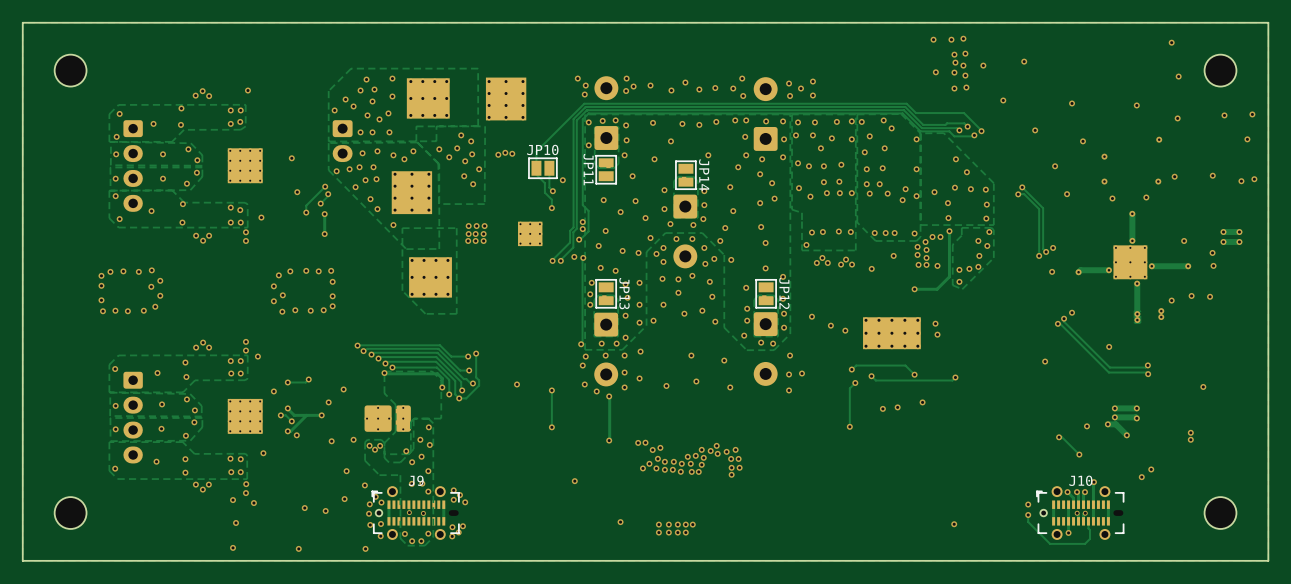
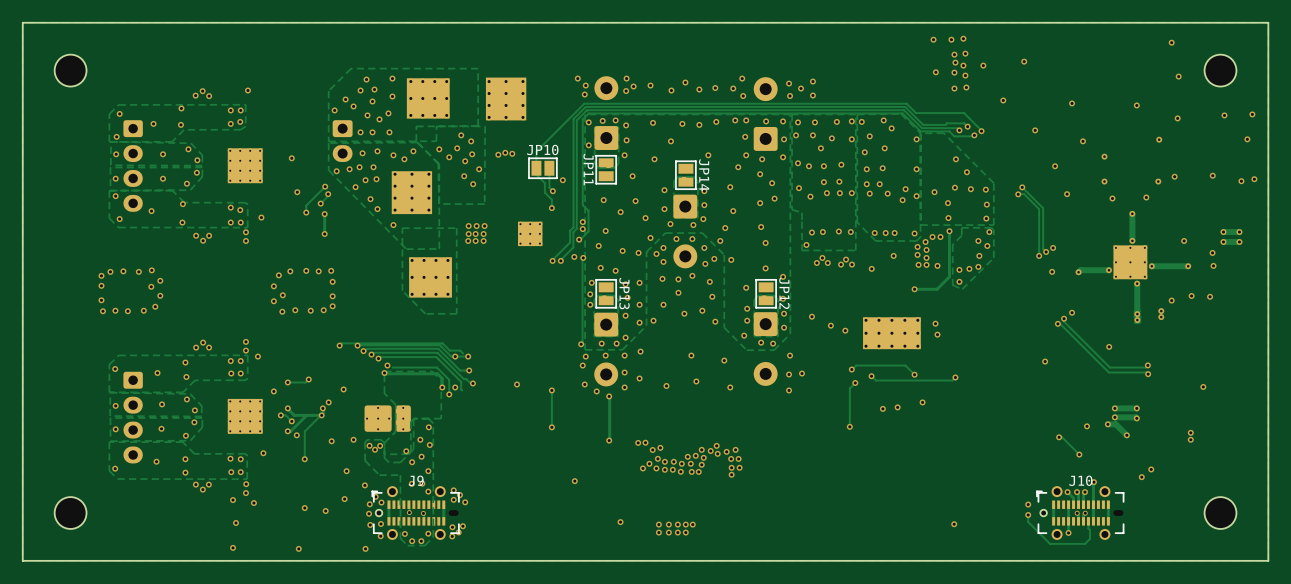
track: none -> (339, 345) (341, 343) (442, 343) (449, 350) (460, 350) (463, 353)
via: none -> (339, 345)
track: (476, 353) (476, 377) (479, 380) (479, 385) (466, 398) (459, 398) (455, 394) (455, 380) (436, 361) (385, 361) (385, 363) -> none
via: (476, 353) -> none
via: none -> (455, 356)
via: (385, 363) -> none
via: none -> (387, 365)
via: (392, 367) -> none
via: none -> (455, 387)
via: (462, 390) -> none
via: (459, 398) -> none
track: none -> (322, 408) (323, 412) (304, 431) (304, 459)
via: none -> (322, 408)
via: none -> (304, 459)

